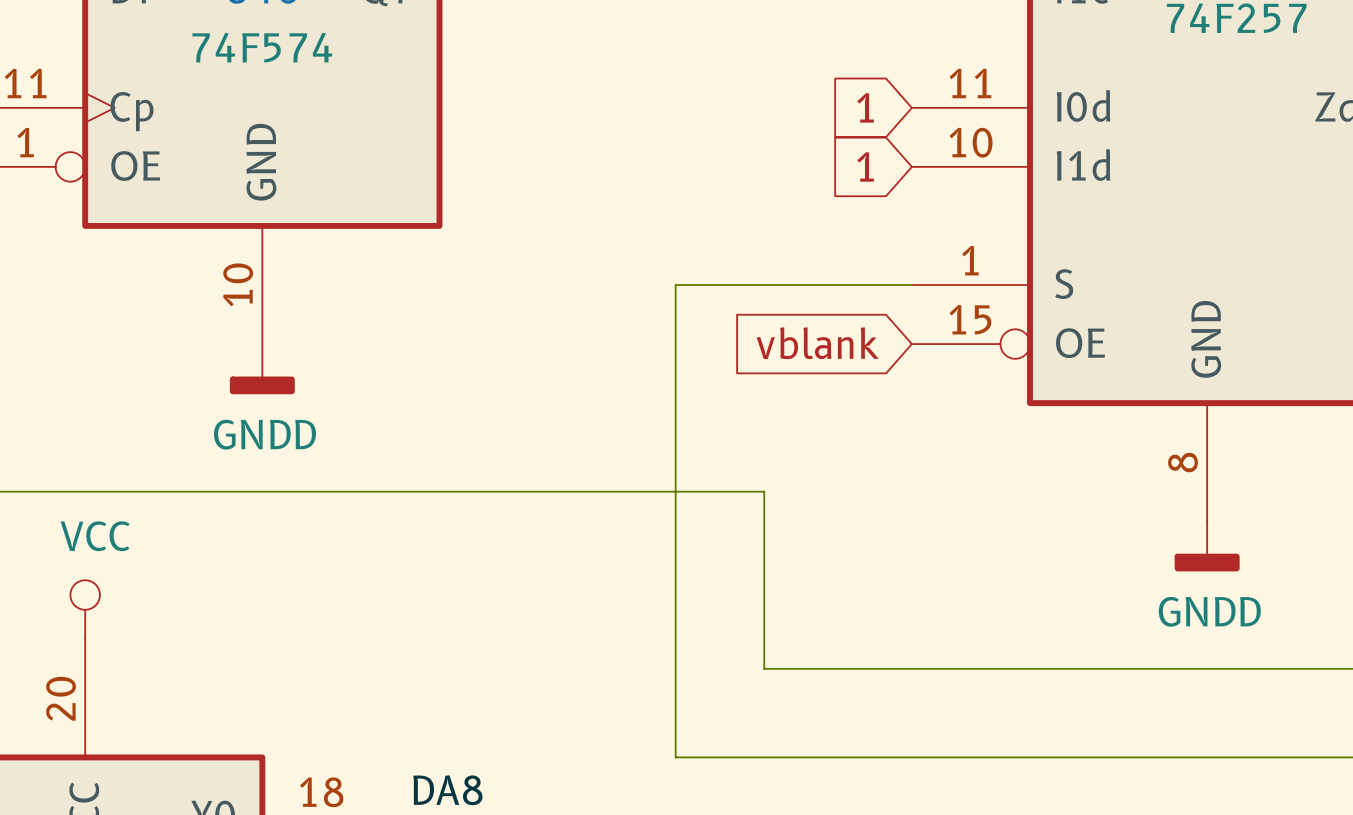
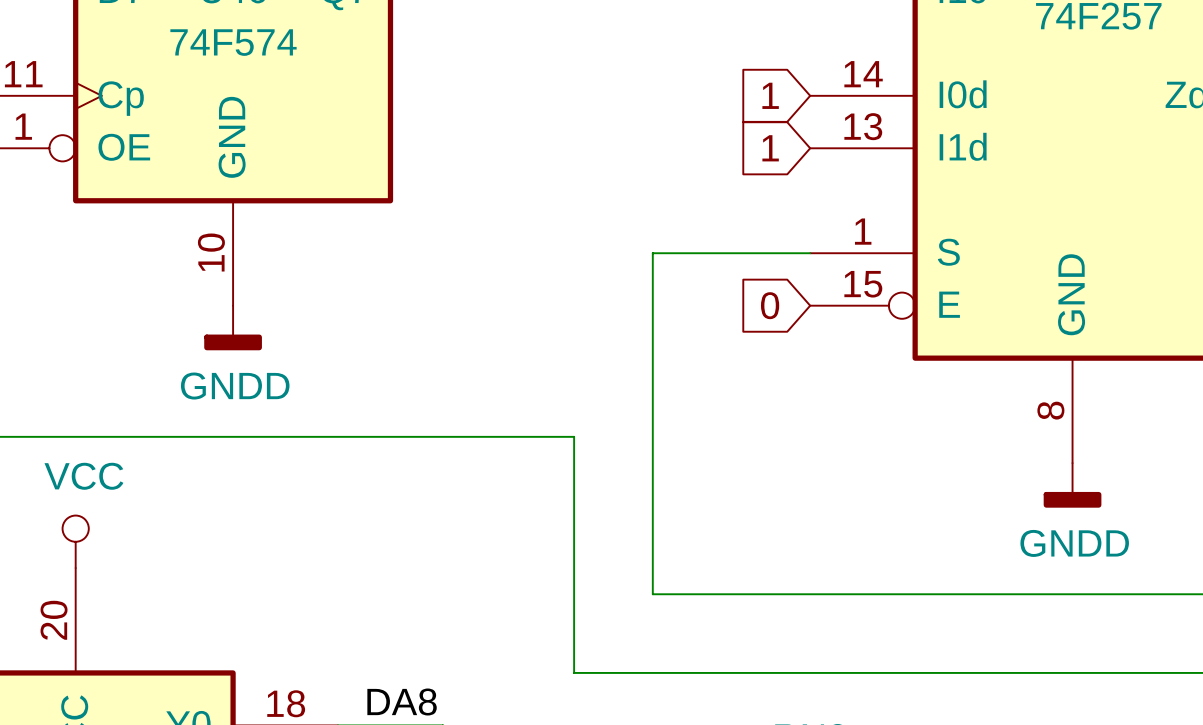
part pin number: 11 (970, 83) -> 14 (863, 74)
part pin number: 10 (971, 142) -> 13 (863, 126)
wire: (734, 285) (675, 285) (675, 757) -> (652, 253) (652, 594) (679, 594)
global label: vblank (817, 343) -> 0 (770, 305)
part pin name: OE (1080, 343) -> E (949, 304)
wire: (646, 491) (764, 491) (764, 668) -> (574, 436) (574, 672) (600, 672)

